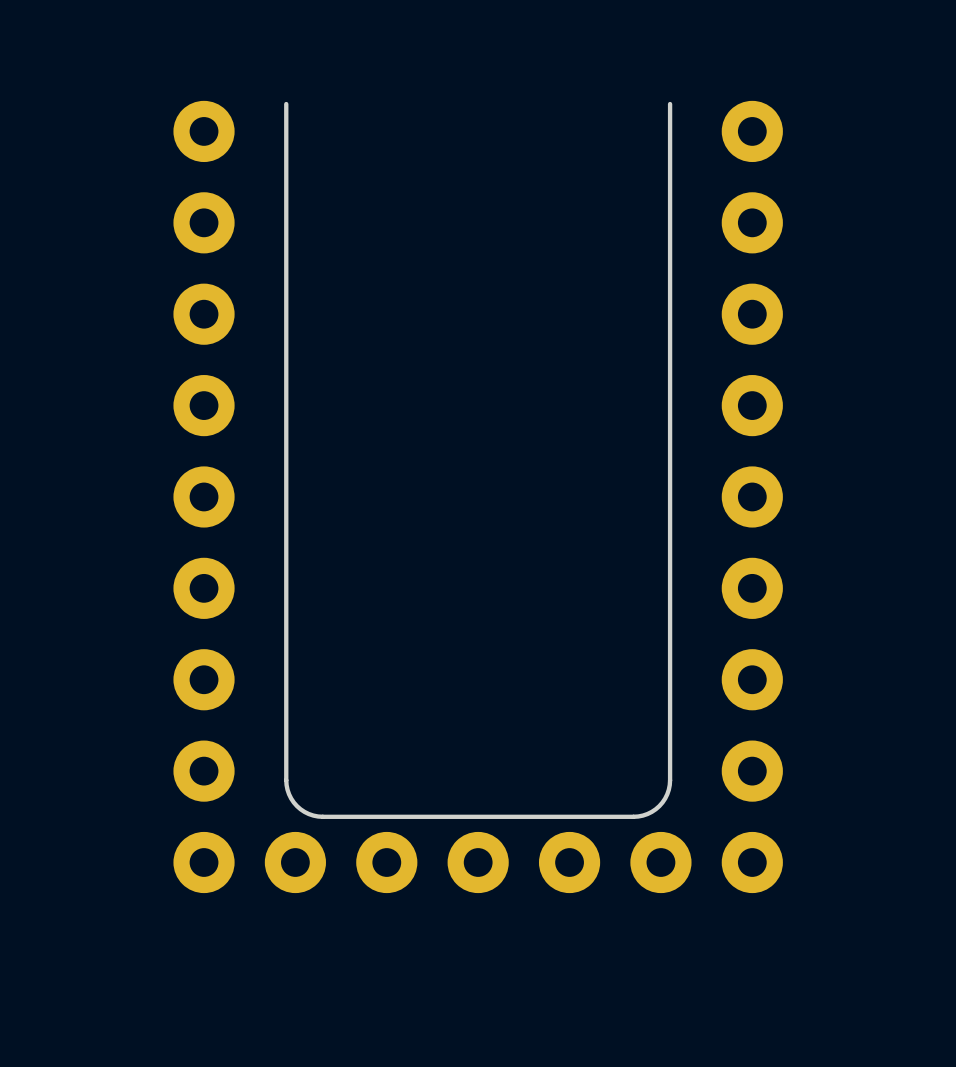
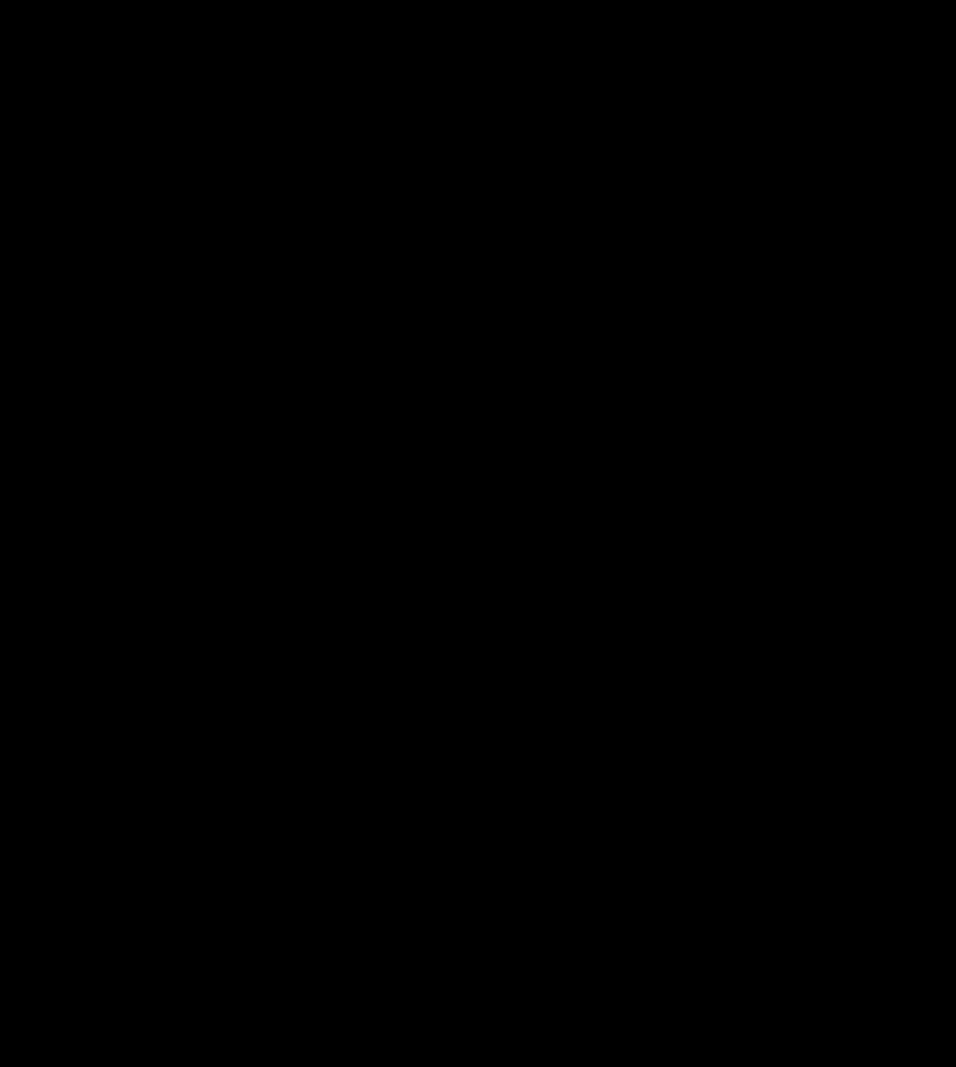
part: (478, 496) -> none

